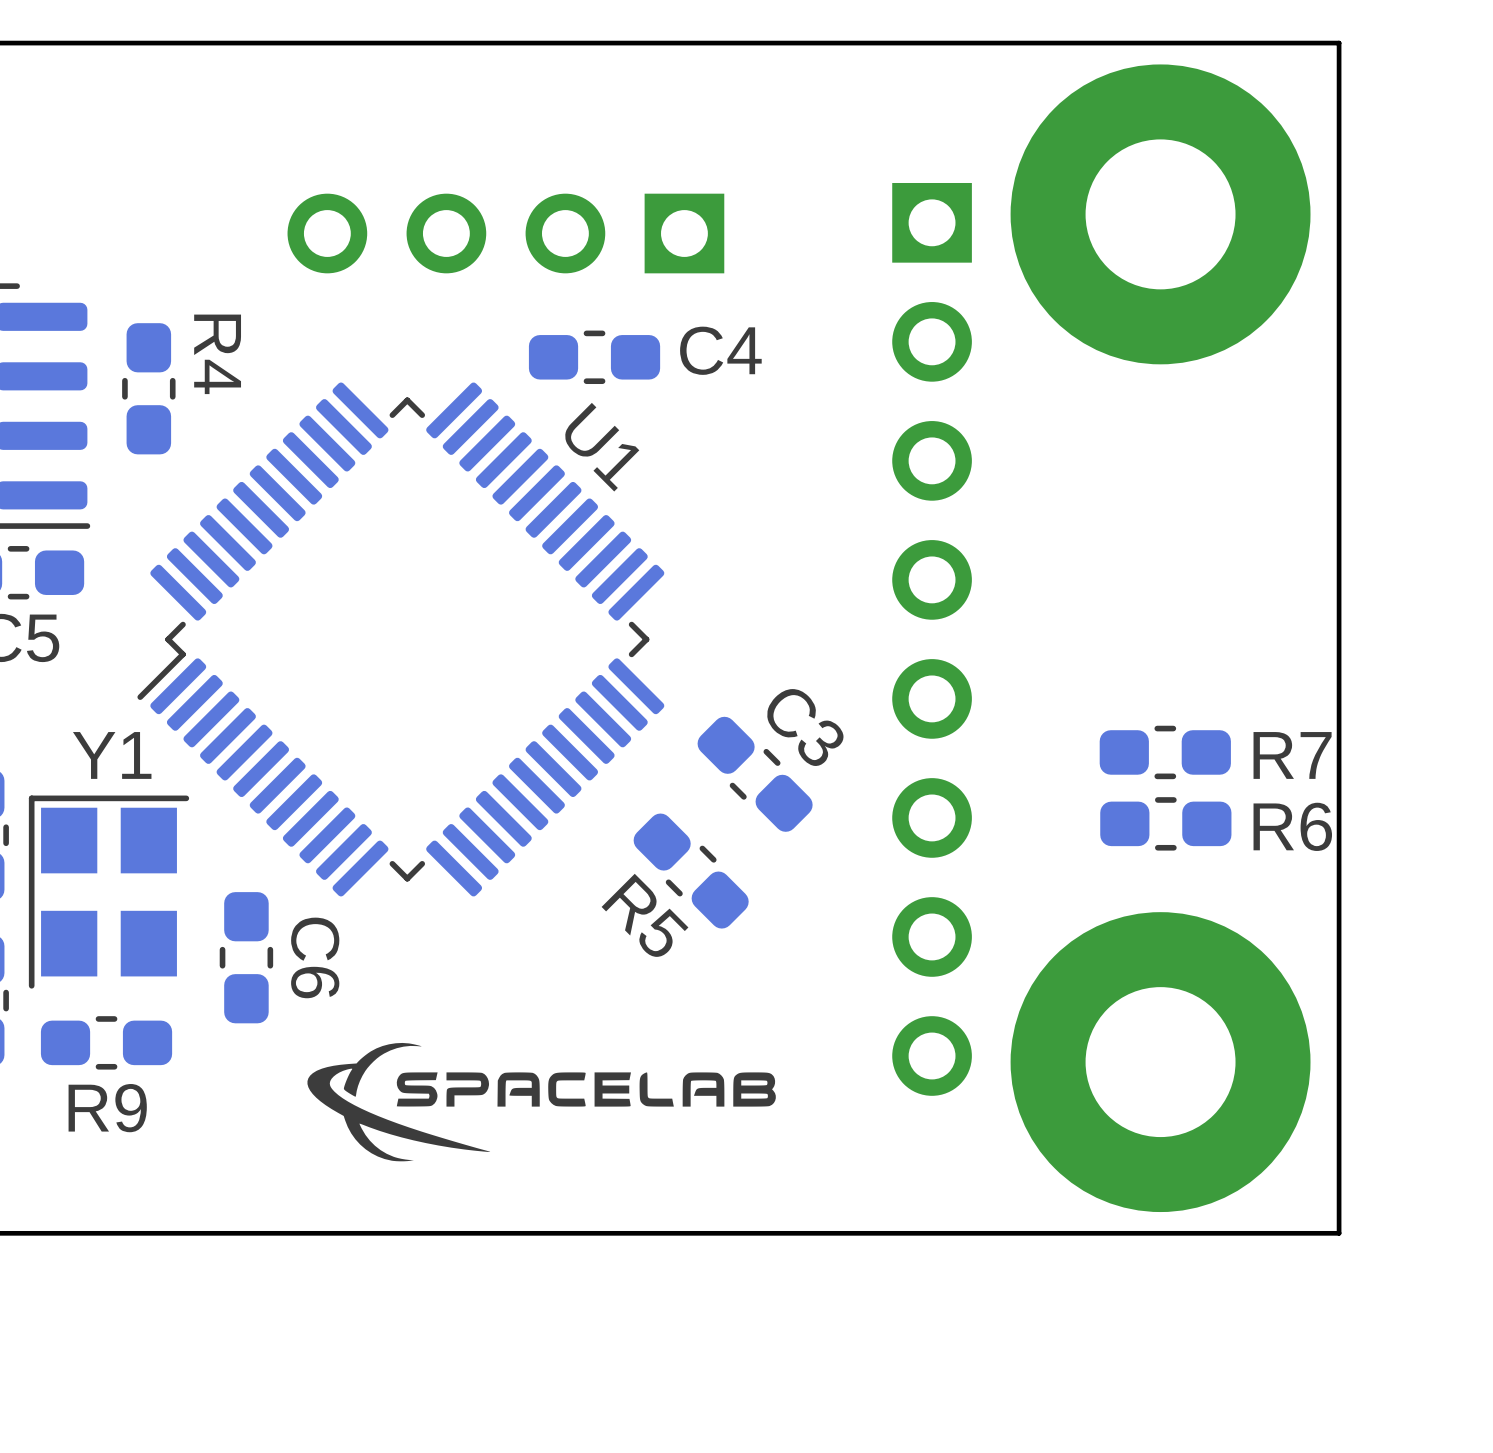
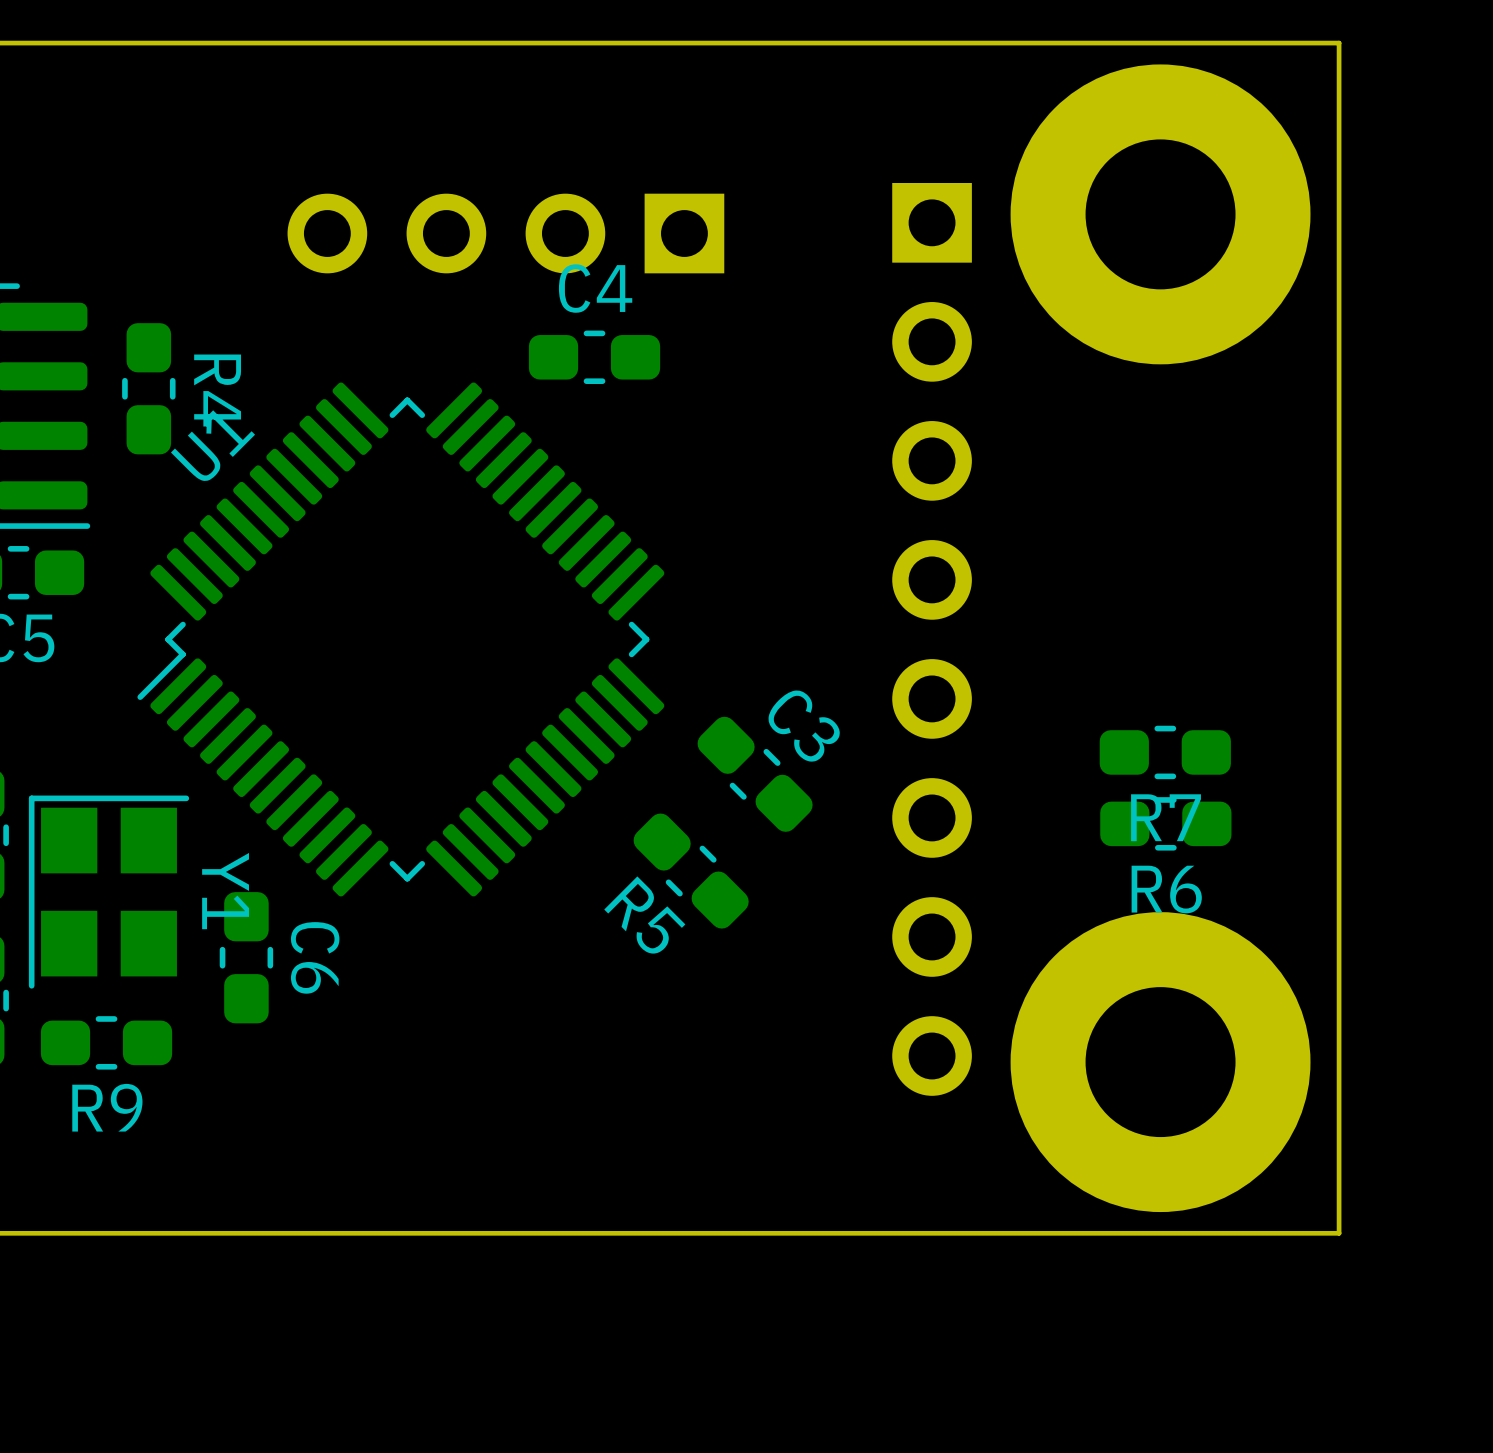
C4 name position: C4 (720, 350) -> C4 (595, 288)
R4 name position: R4 (217, 354) -> R4 (217, 390)
U1 name rotation: 0° (601, 447) -> 90° counterclockwise (213, 445)
U1 name position: U1 (601, 447) -> U1 (213, 445)
Y1 name rotation: 0° (112, 755) -> 90° clockwise (225, 891)
Y1 name position: Y1 (112, 755) -> Y1 (225, 891)
R7 name position: R7 (1292, 755) -> R7 (1166, 817)
R6 name position: R6 (1292, 826) -> R6 (1166, 889)
drawing: [307, 1042, 776, 1162] -> none

